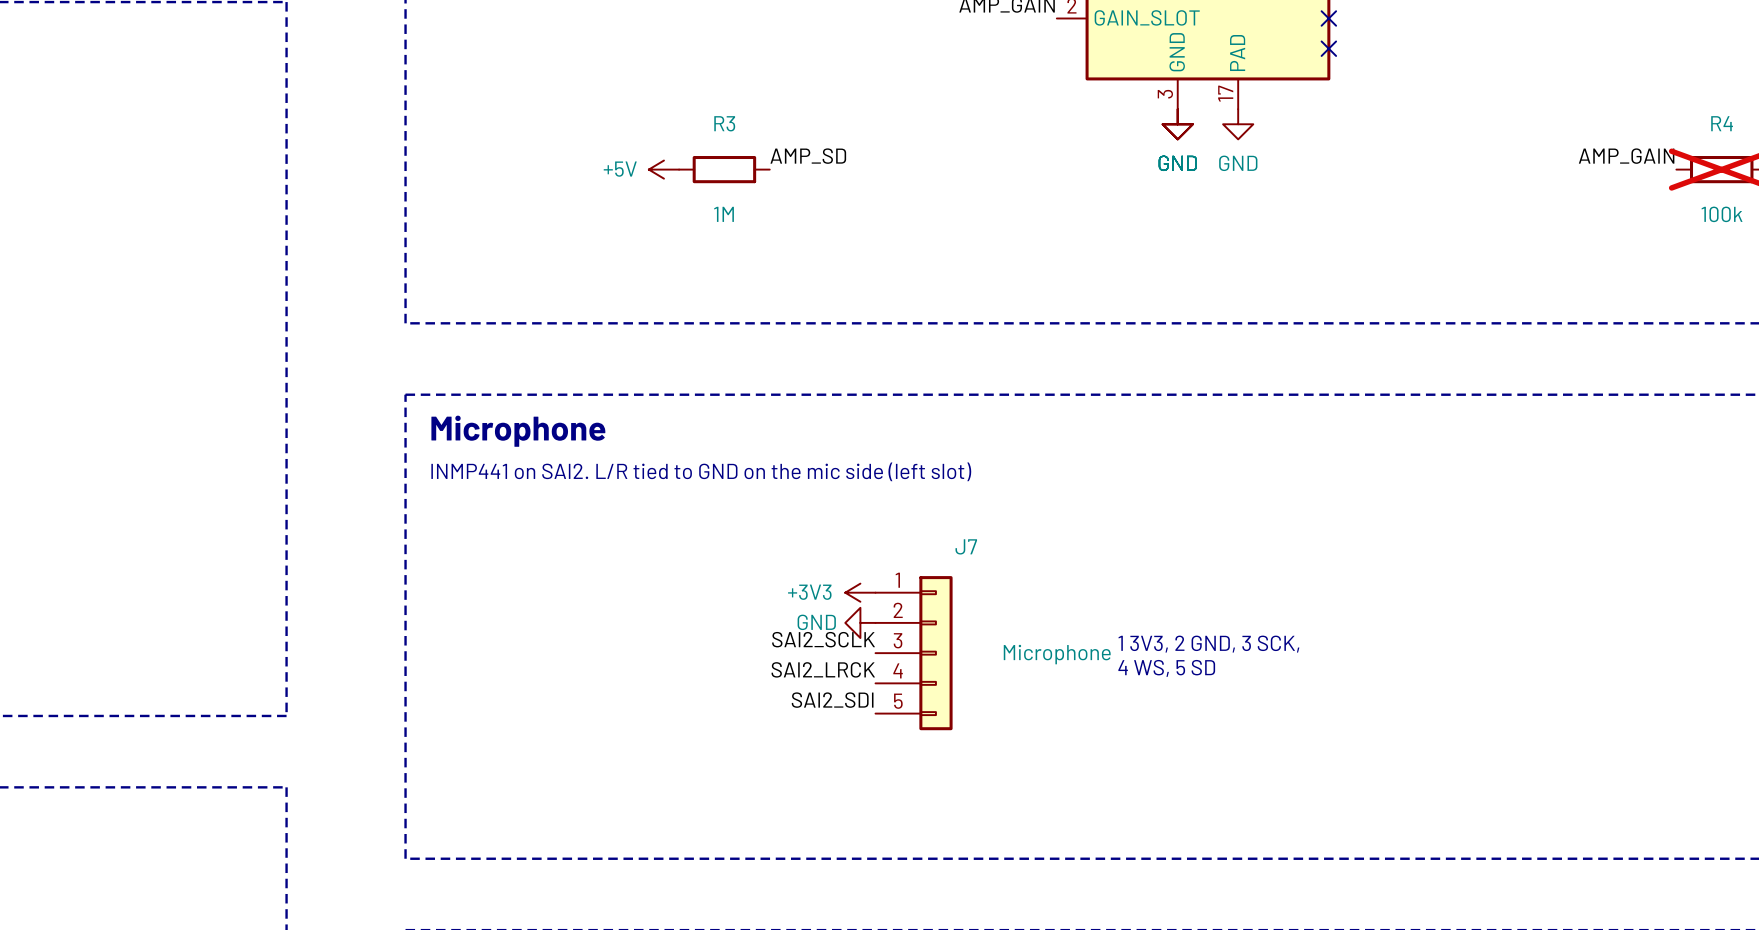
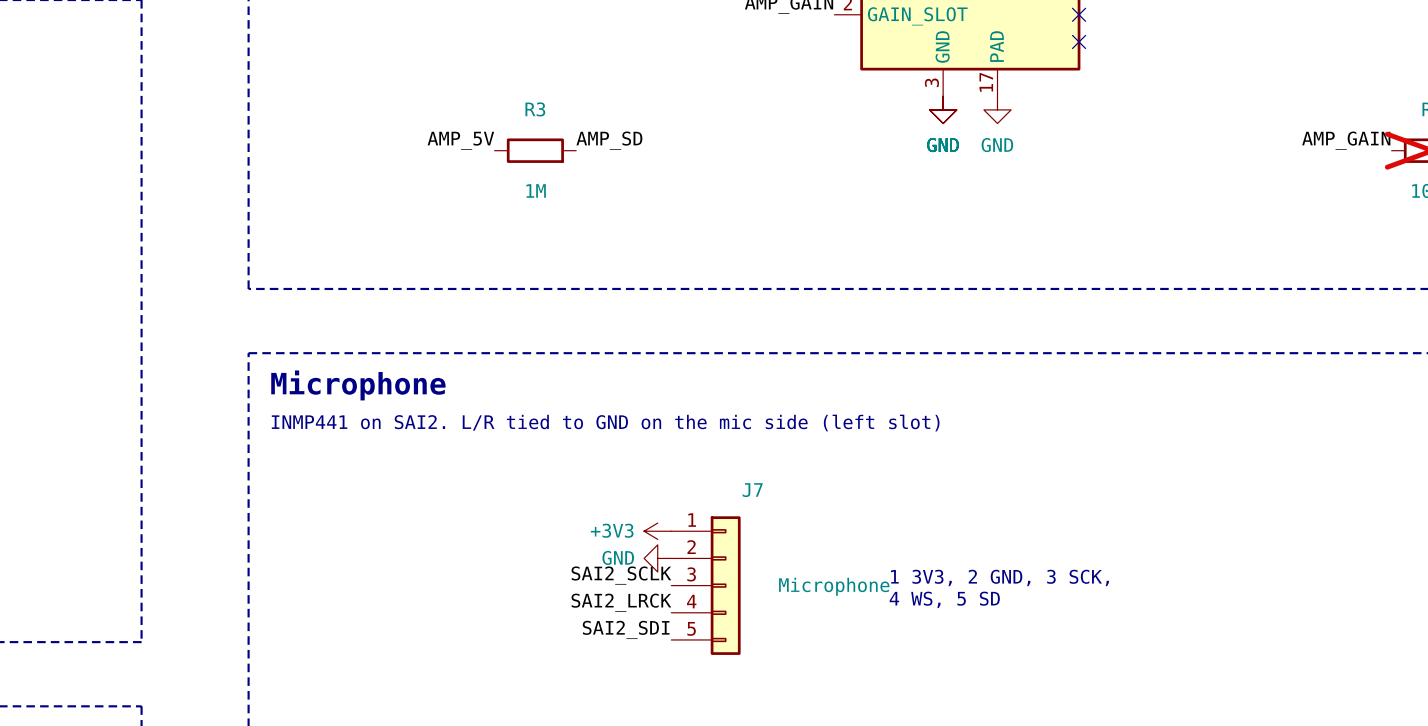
label: none -> AMP_5V (460, 140)
power symbol: +5V (663, 169) -> none

